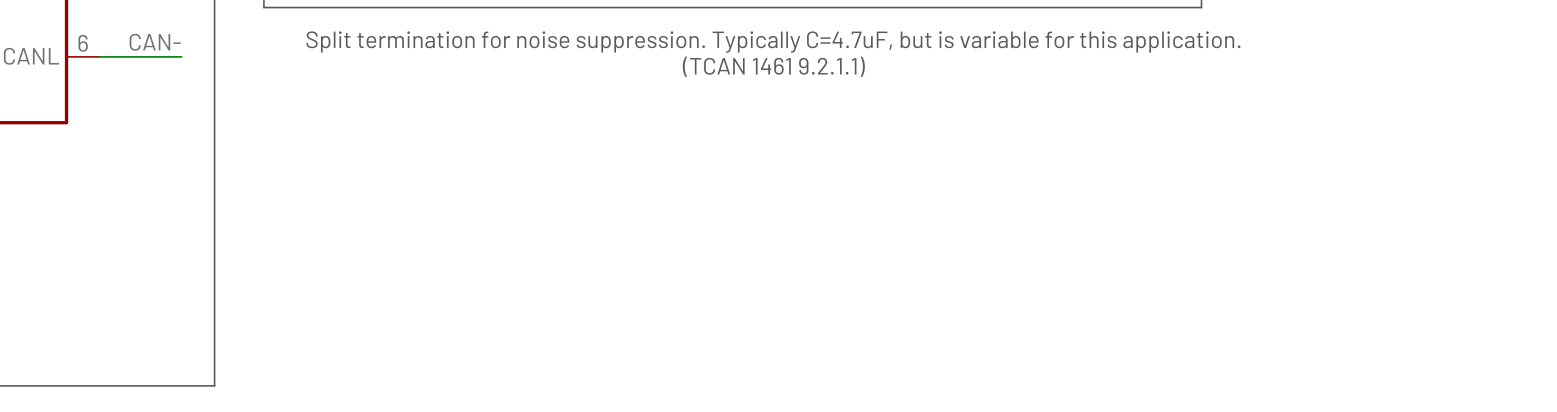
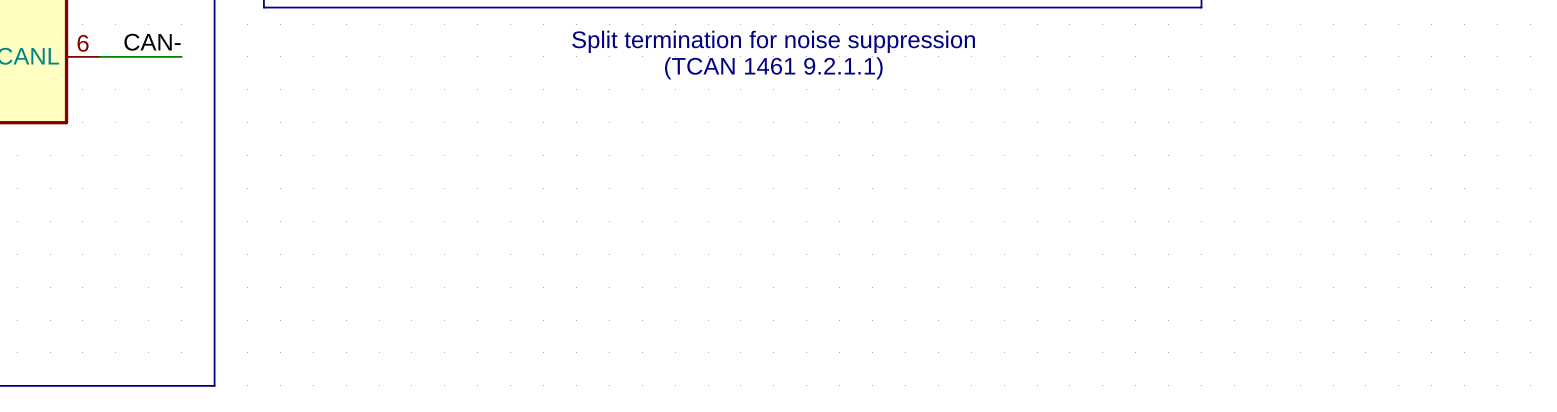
text: Split termination for noise suppression. Typically C=4.7uF, but is variable for this application. (773, 42) -> Split termination for noise suppression (773, 41)

